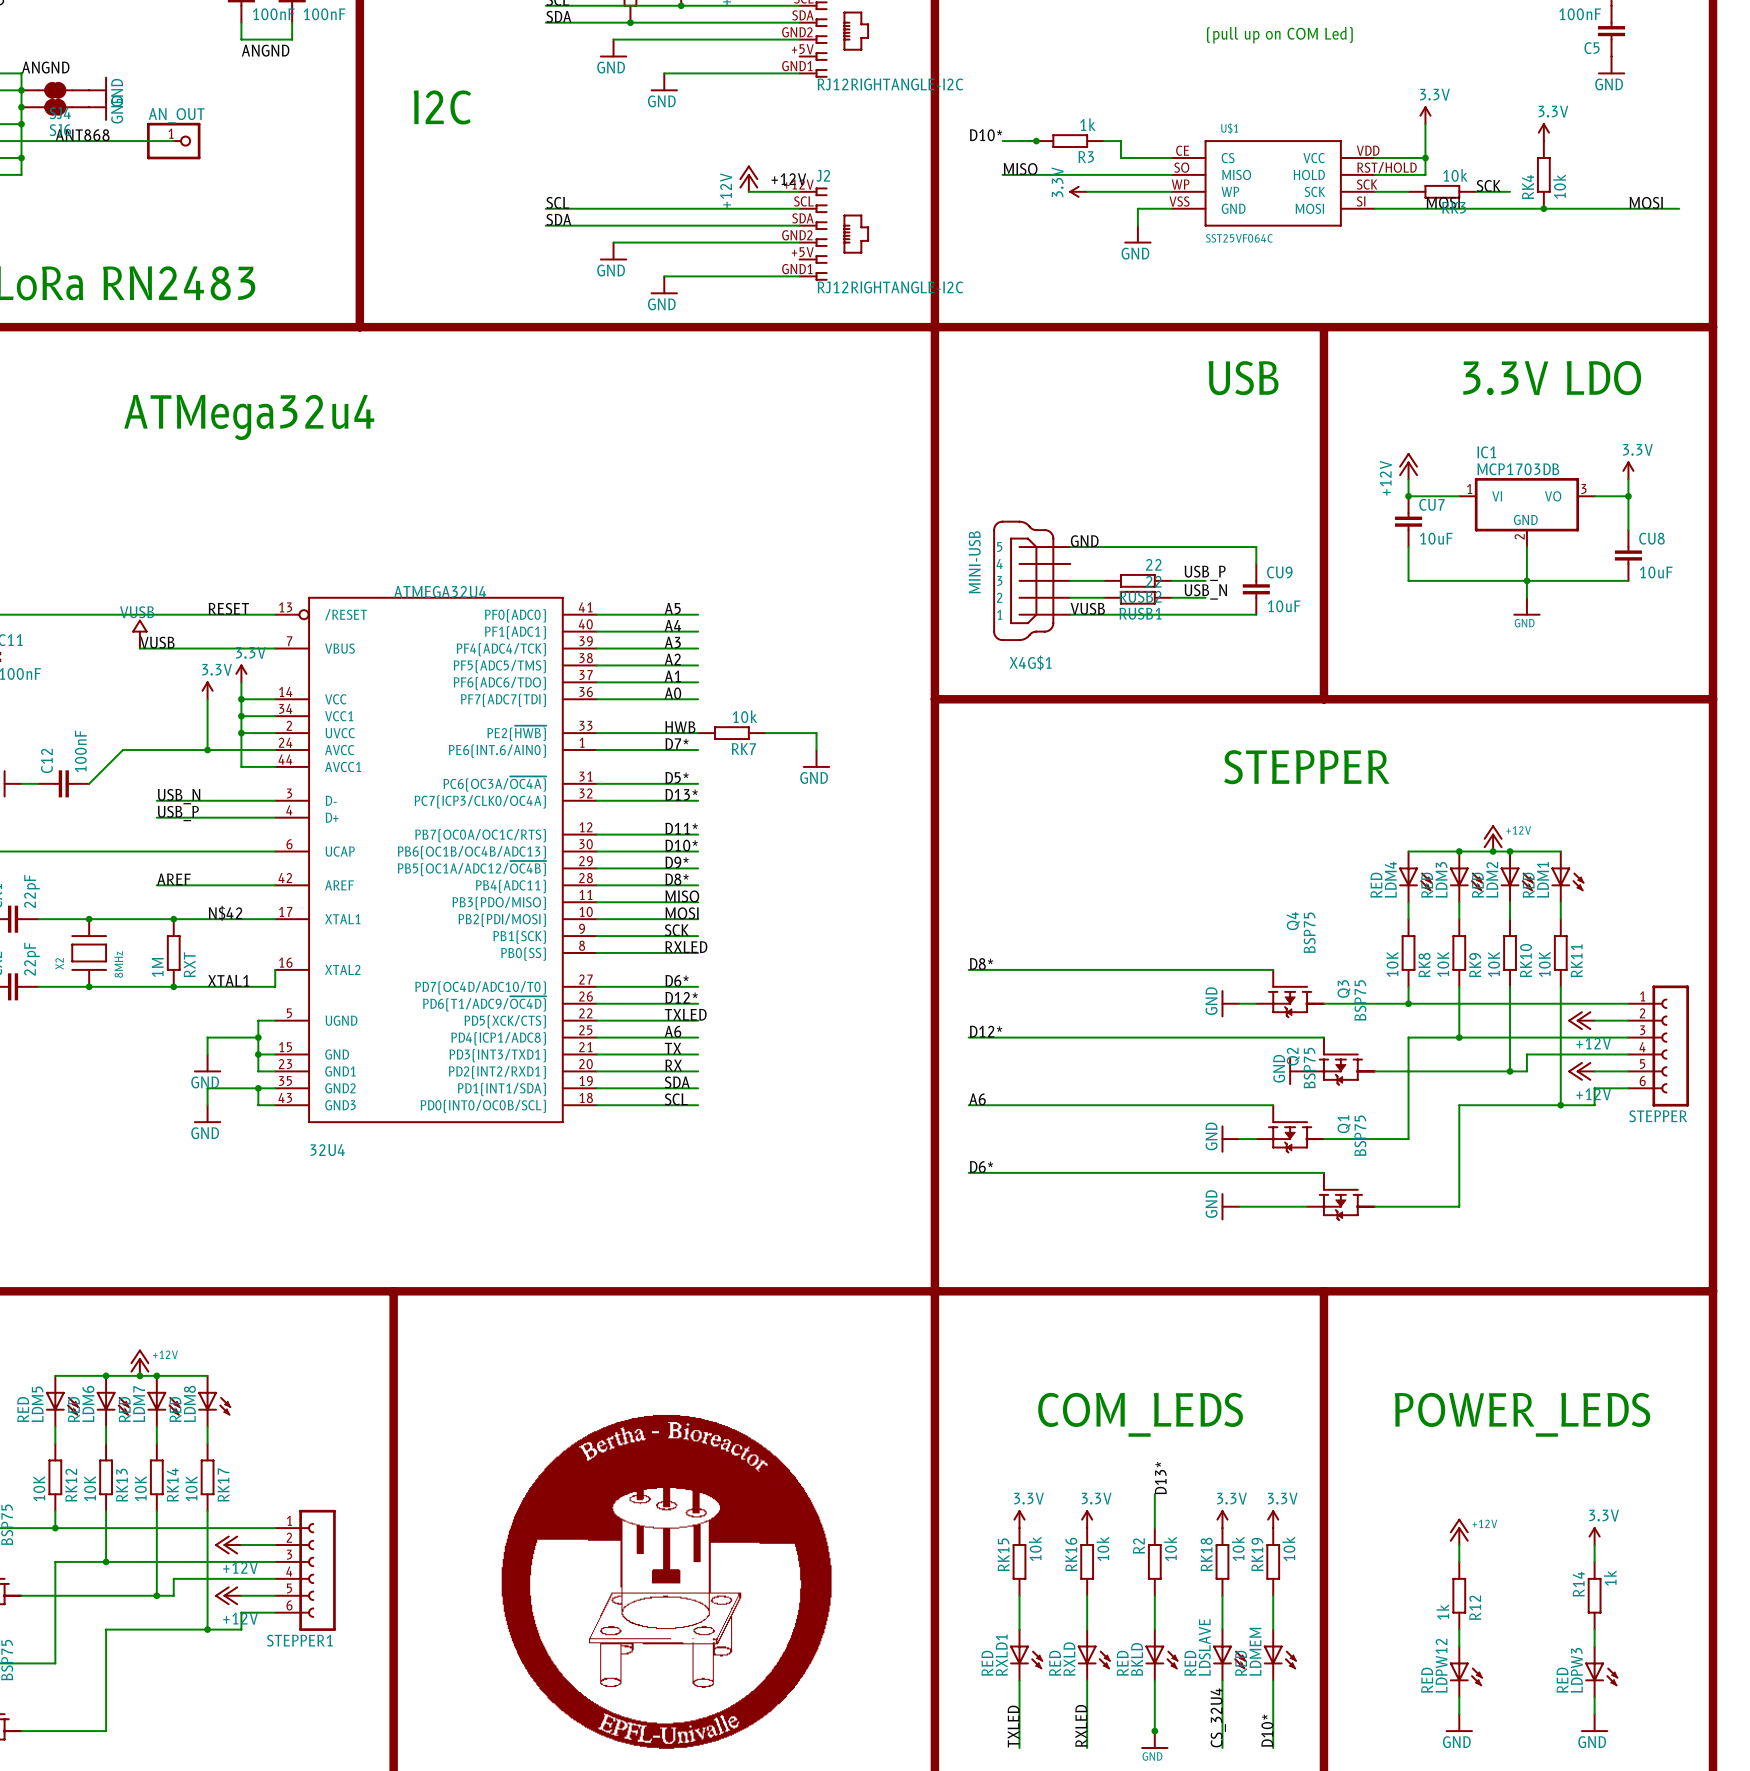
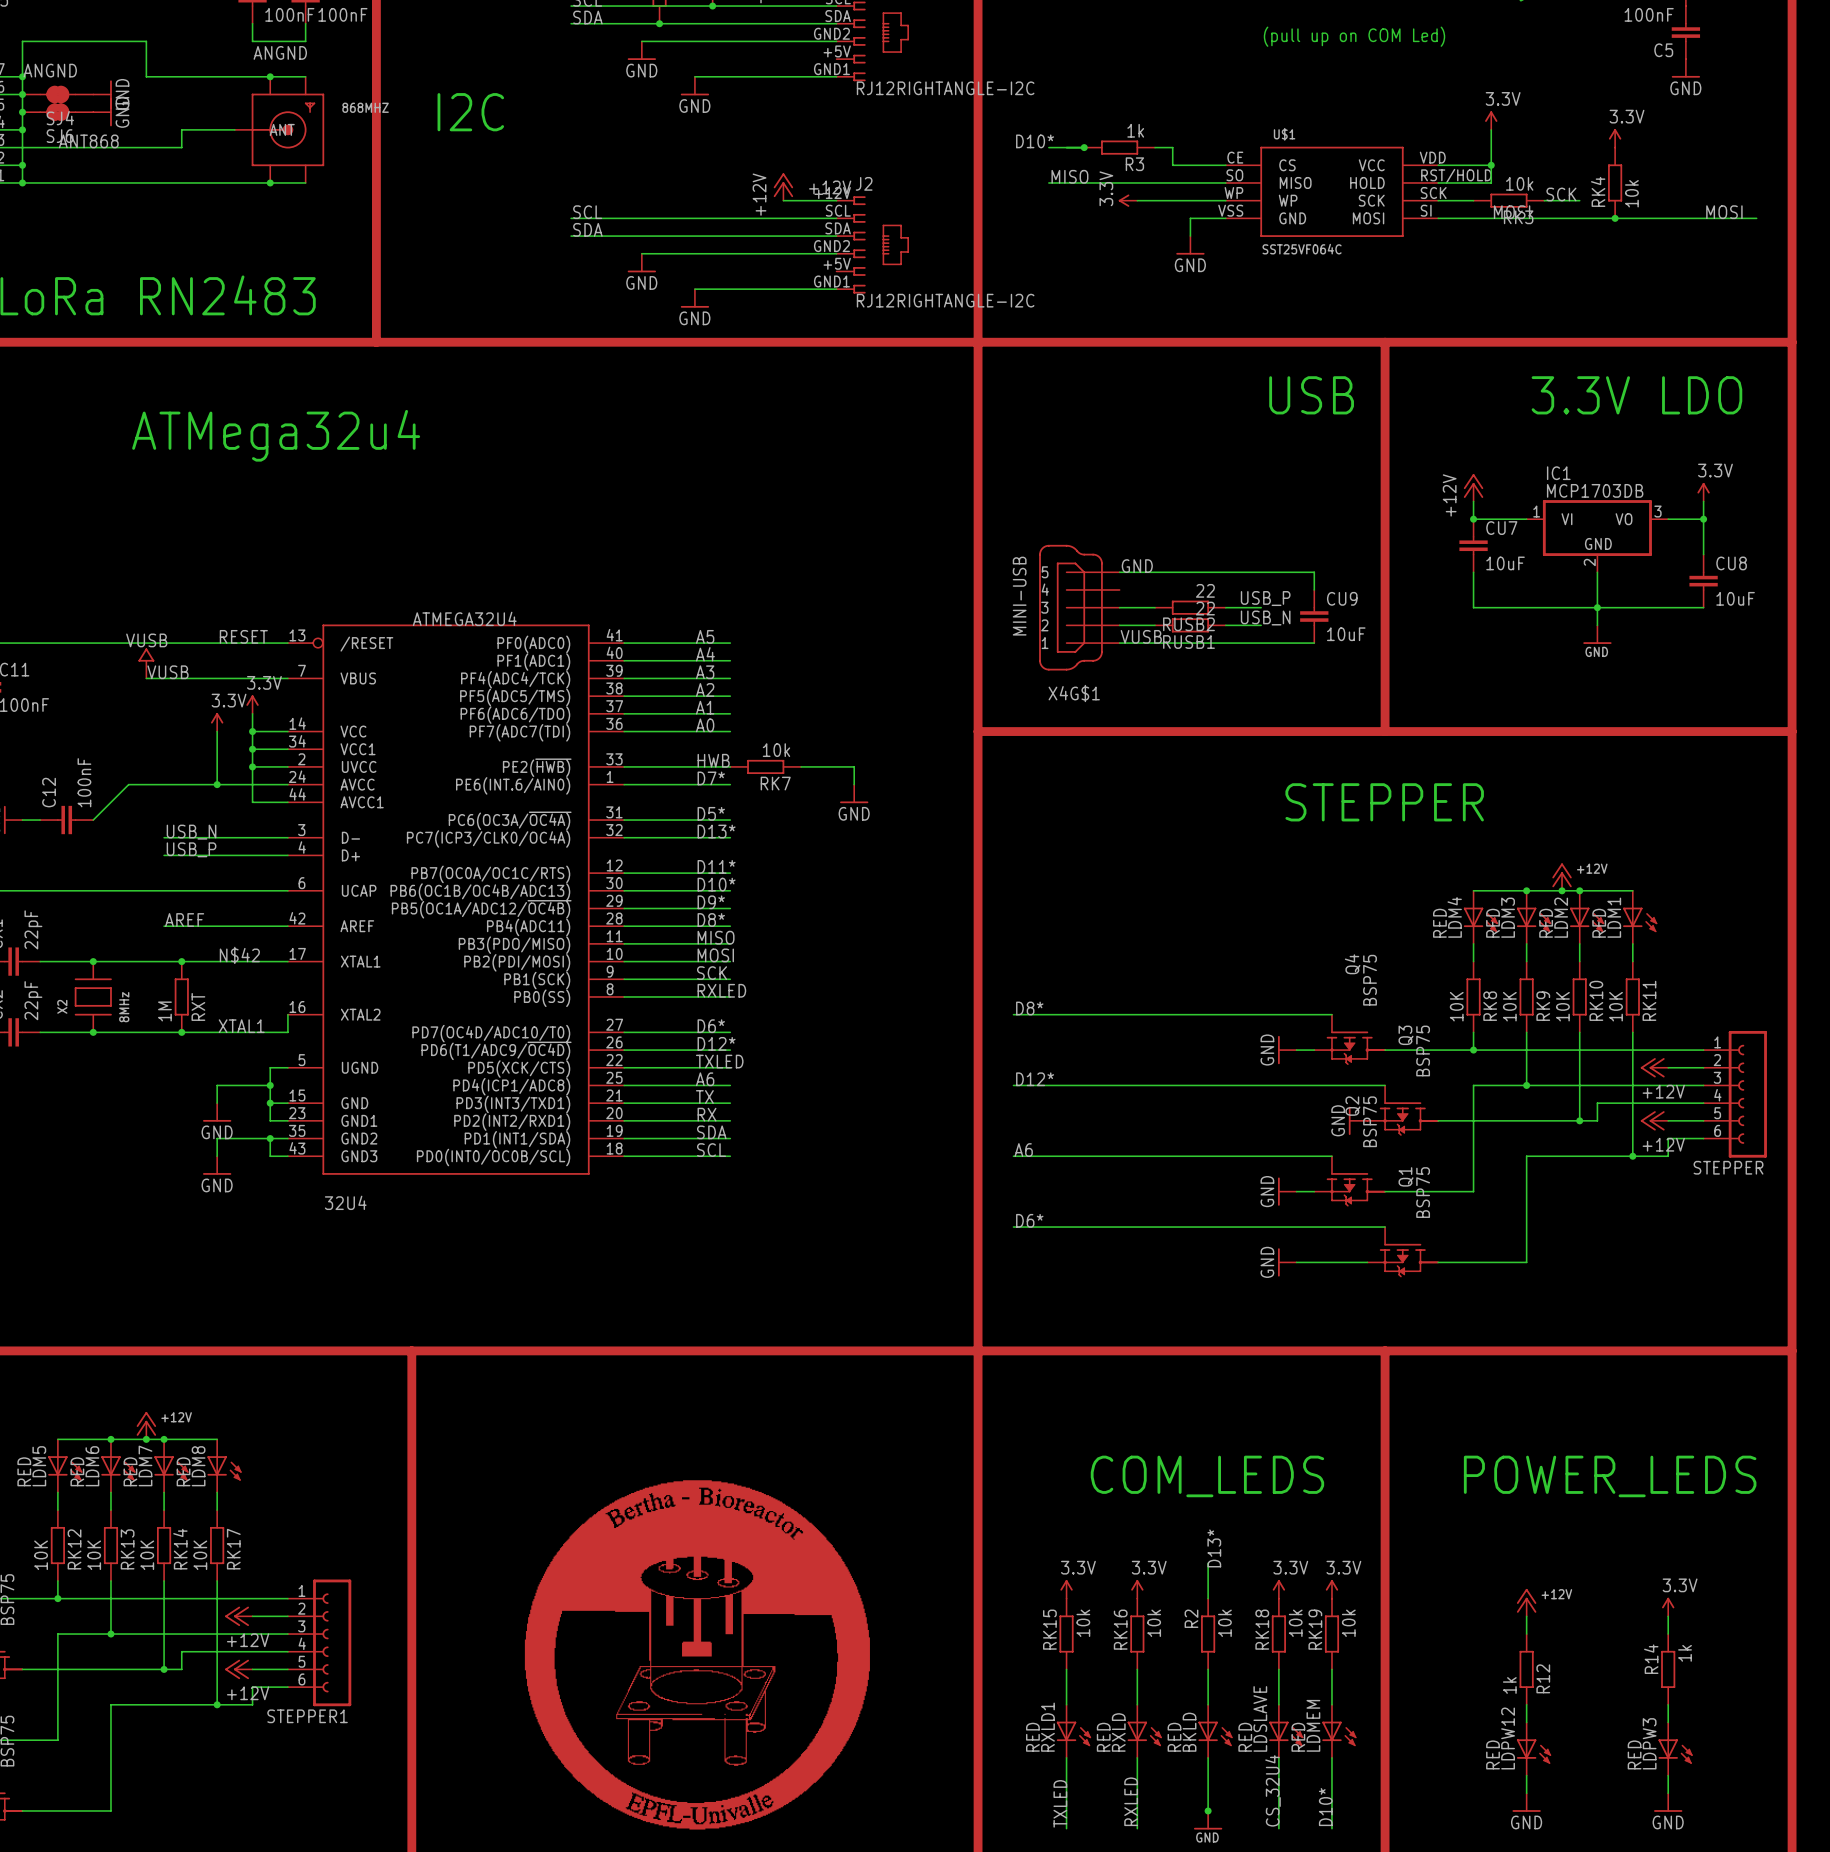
wire: none -> (22, 76) (22, 41) (146, 41) (146, 76) (305, 76)
junction: none -> (22, 76)
junction: none -> (270, 76)
wire: none -> (234, 129) (181, 129) (181, 147)
868MHZ: none -> (279, 129)
AN_OUT: (173, 141) -> none
wire: none -> (22, 182) (305, 182)
junction: none -> (22, 182)
junction: none -> (270, 182)

